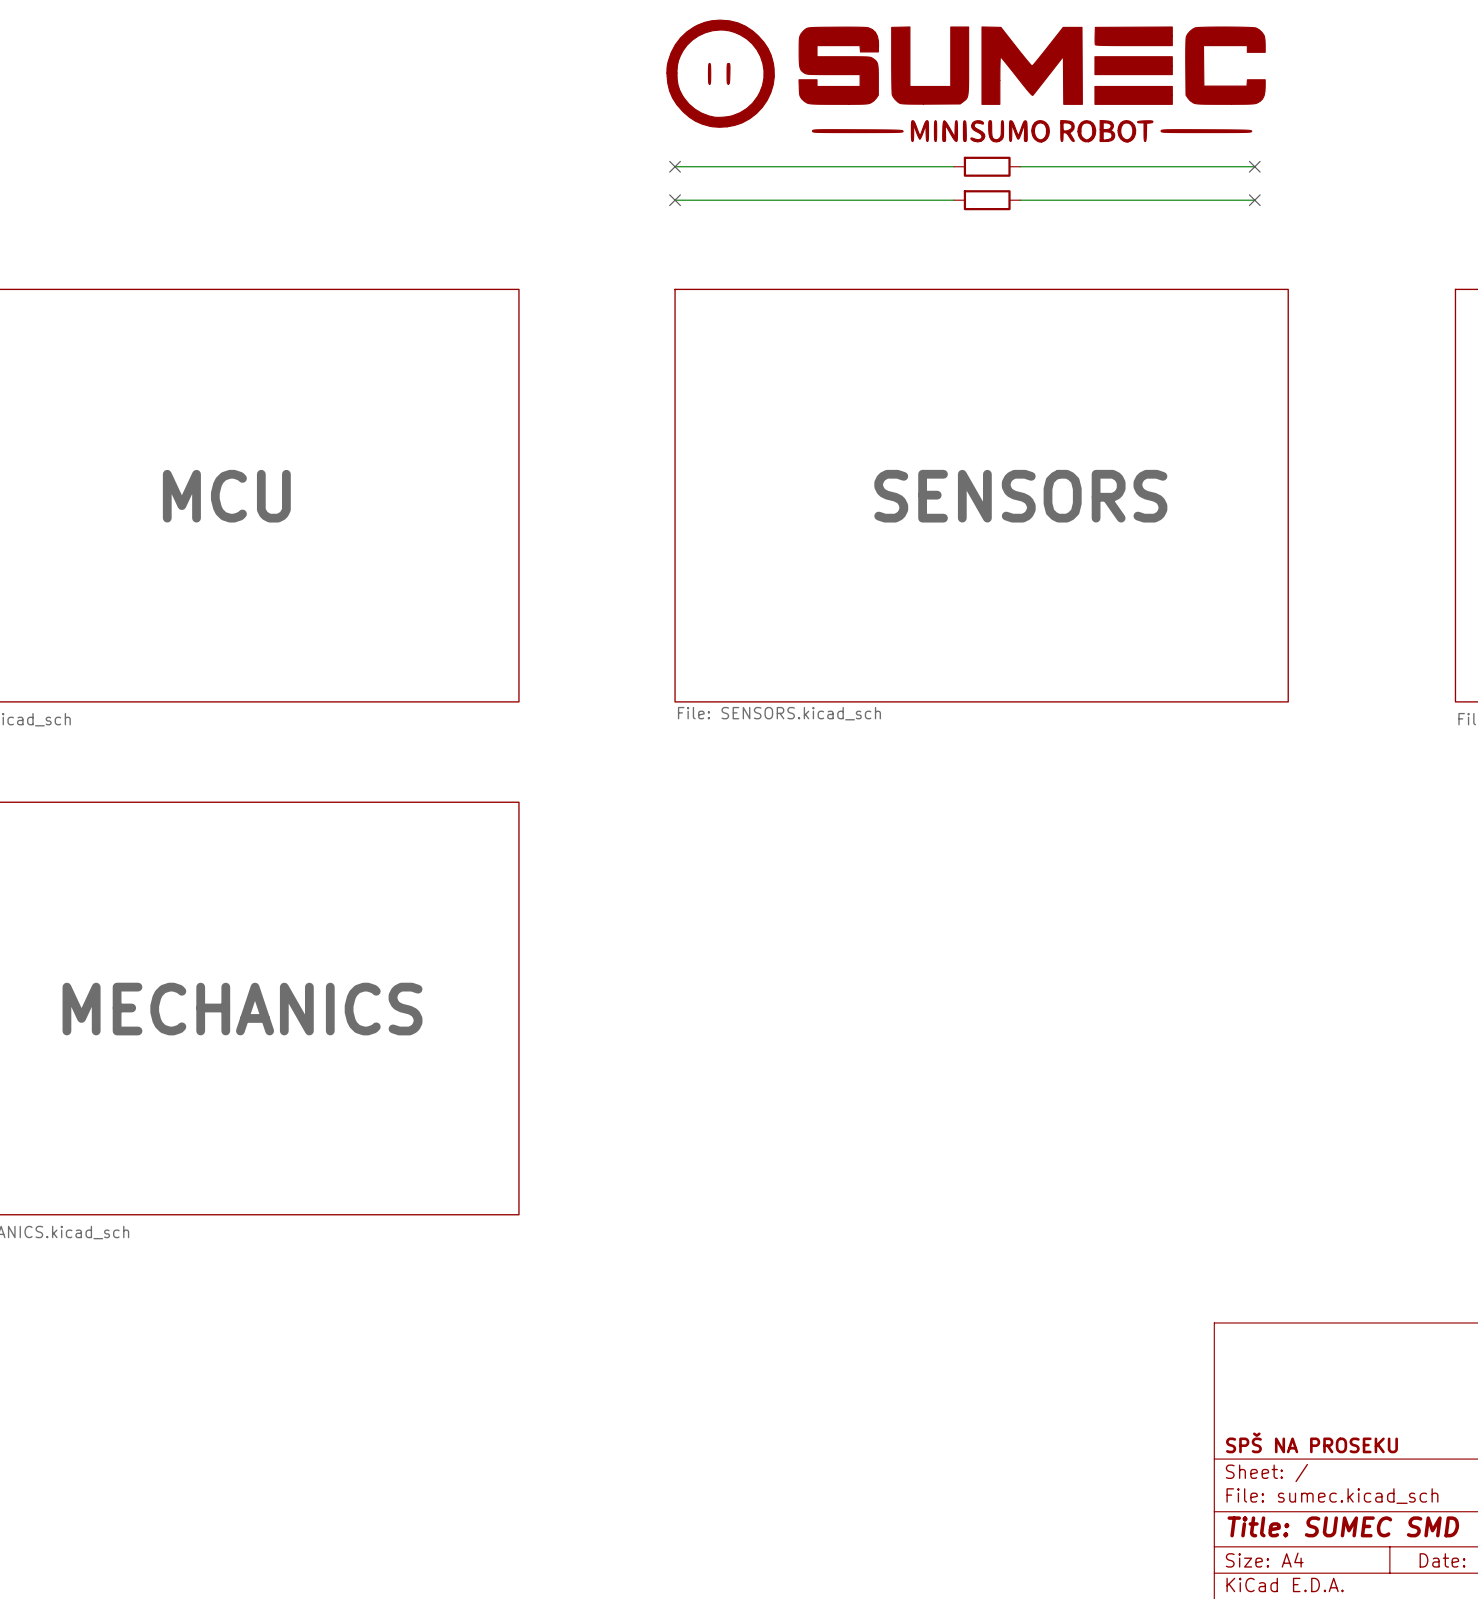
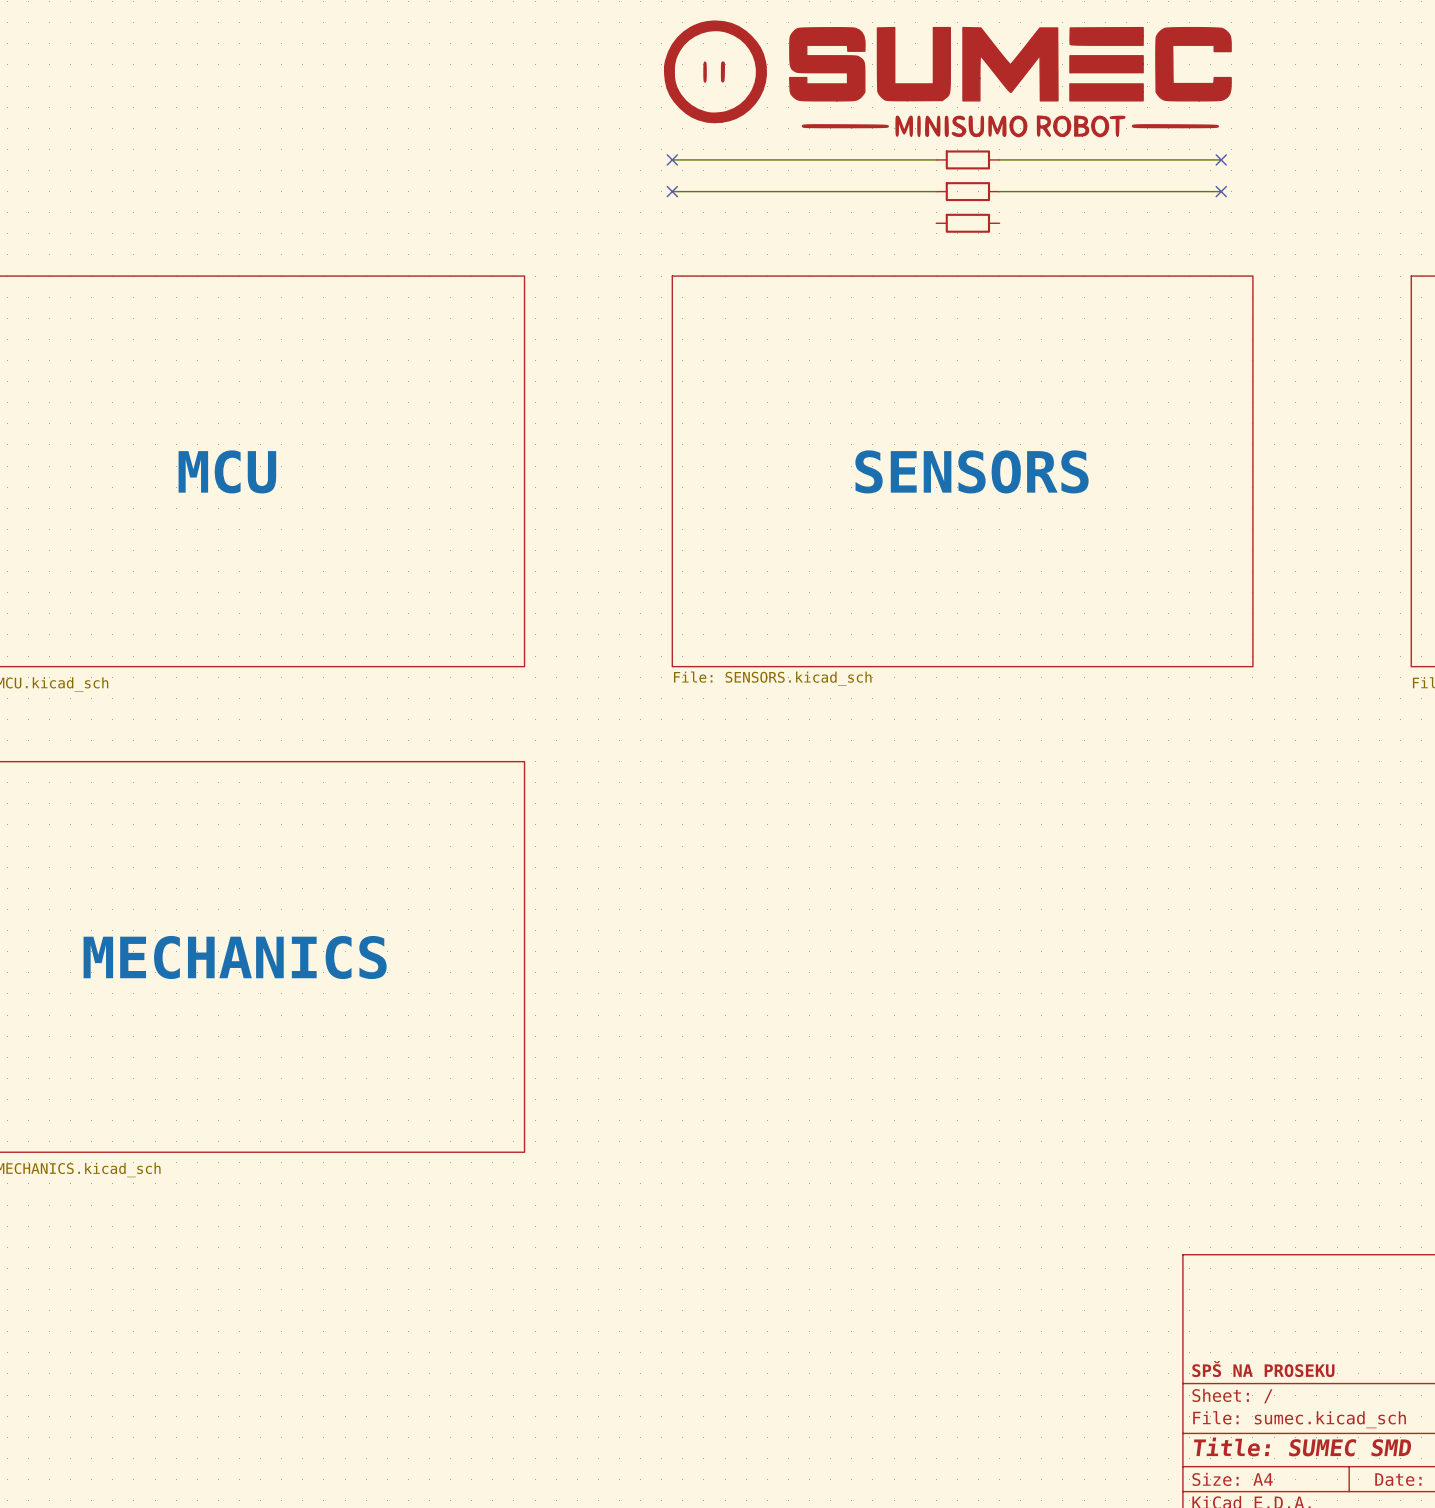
part: none -> (967, 223)

